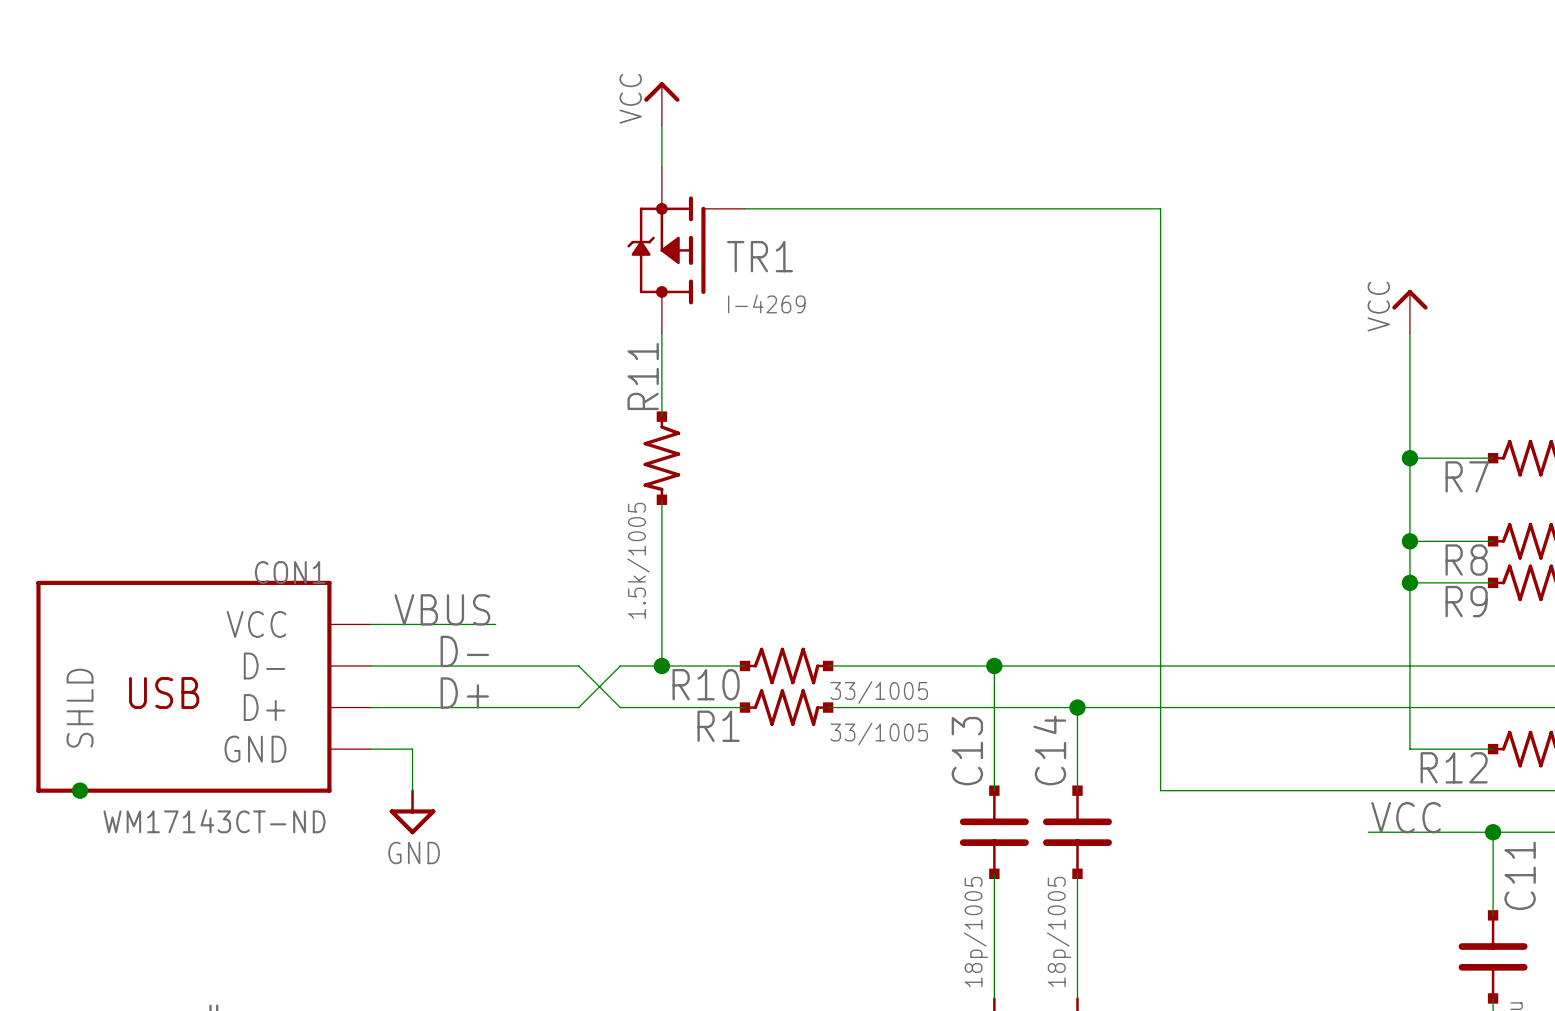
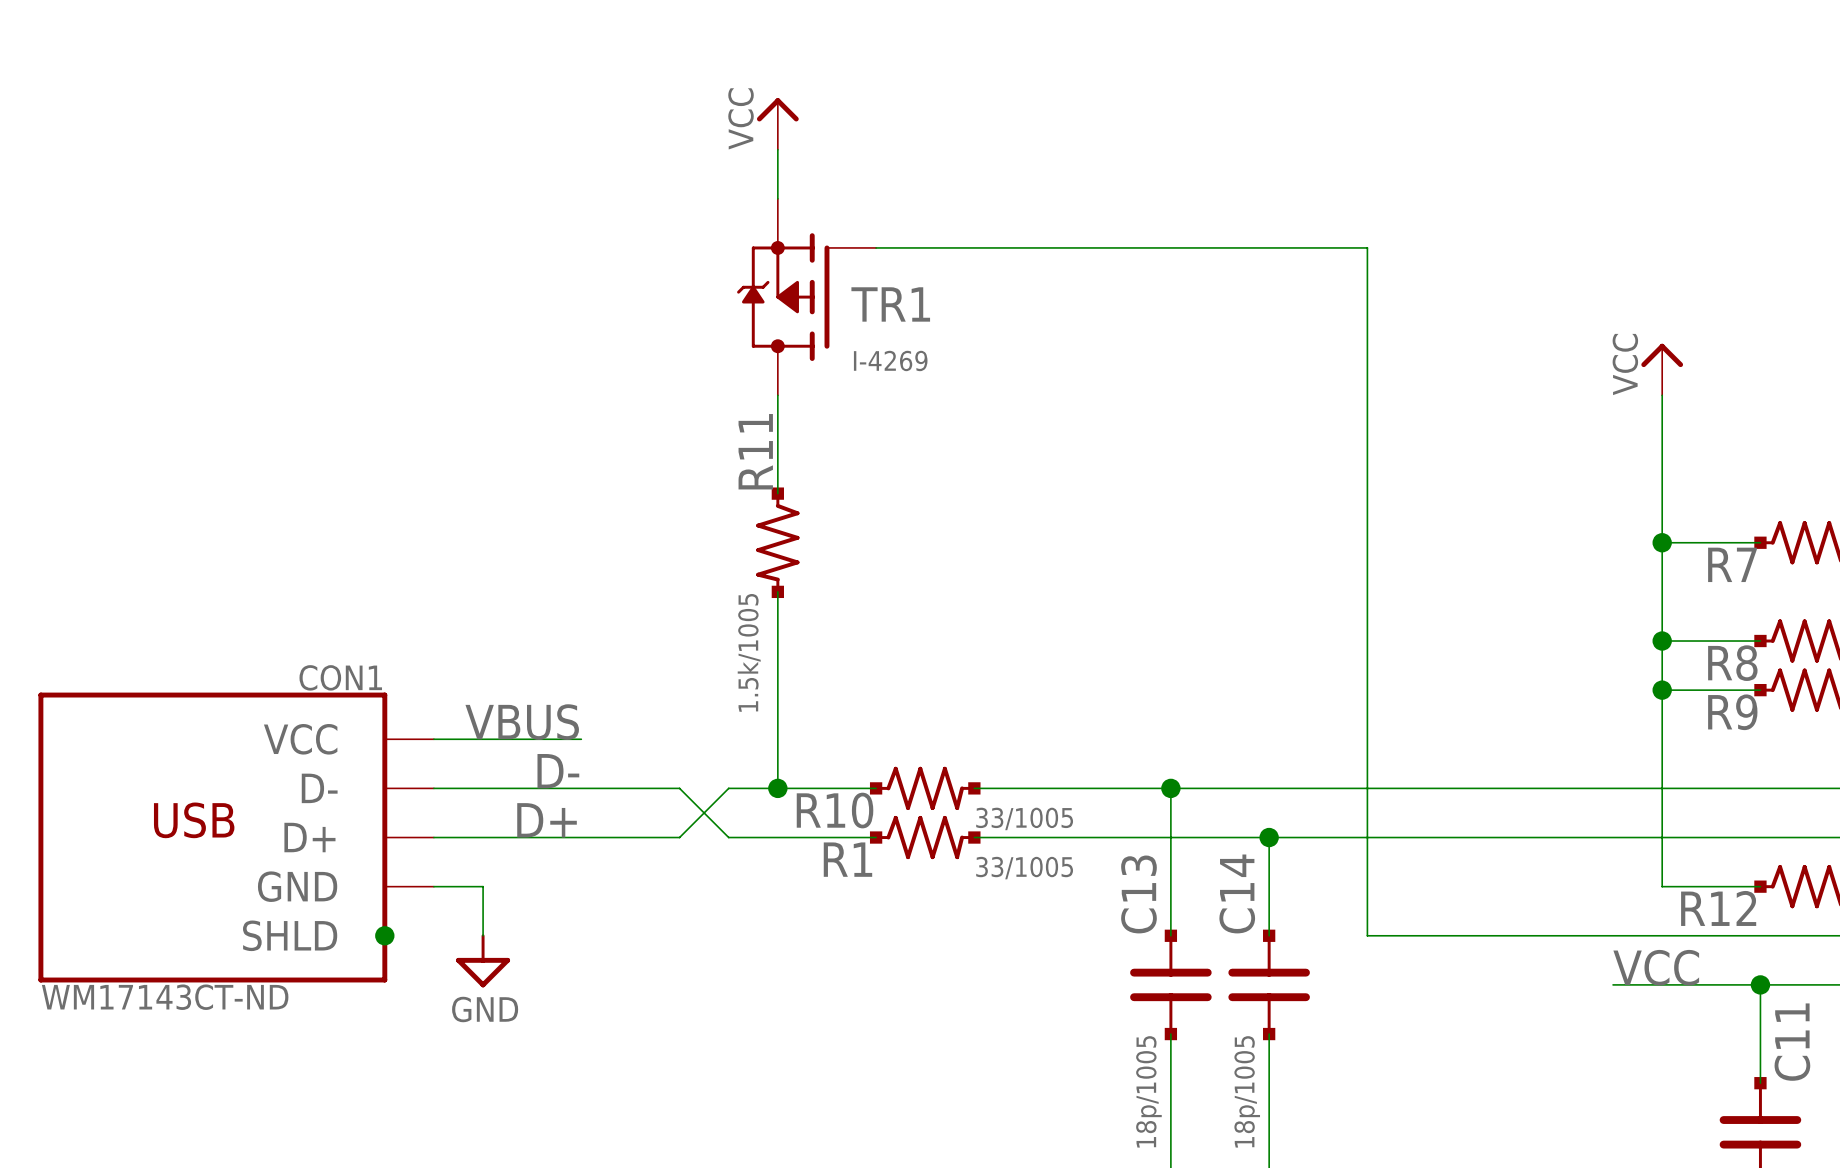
CON1 symbol: [36, 580, 371, 793] -> [38, 692, 434, 983]
junction: (80, 790) -> none
junction: none -> (384, 935)
CON1 value position: WM17143CT-ND (214, 821) -> WM17143CT-ND (165, 997)

